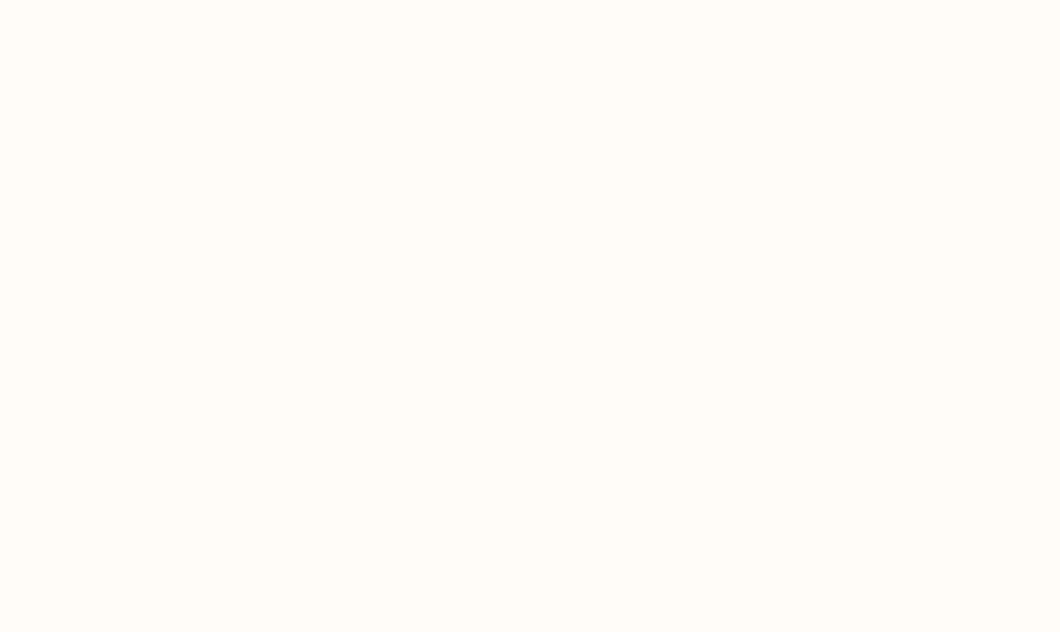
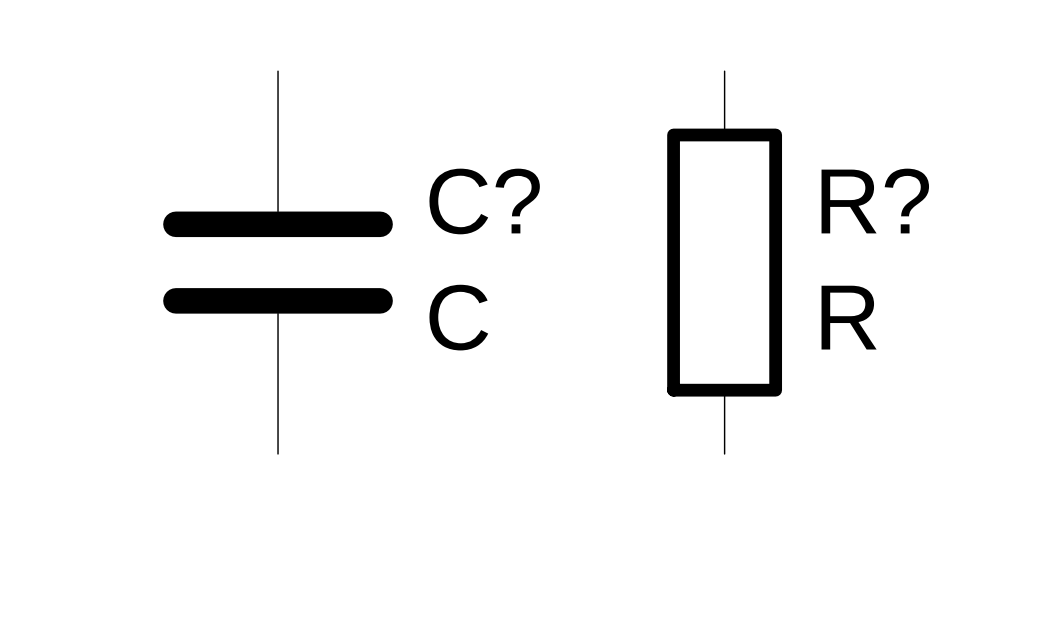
C?: none -> C (278, 262)
R?: none -> R (724, 262)

